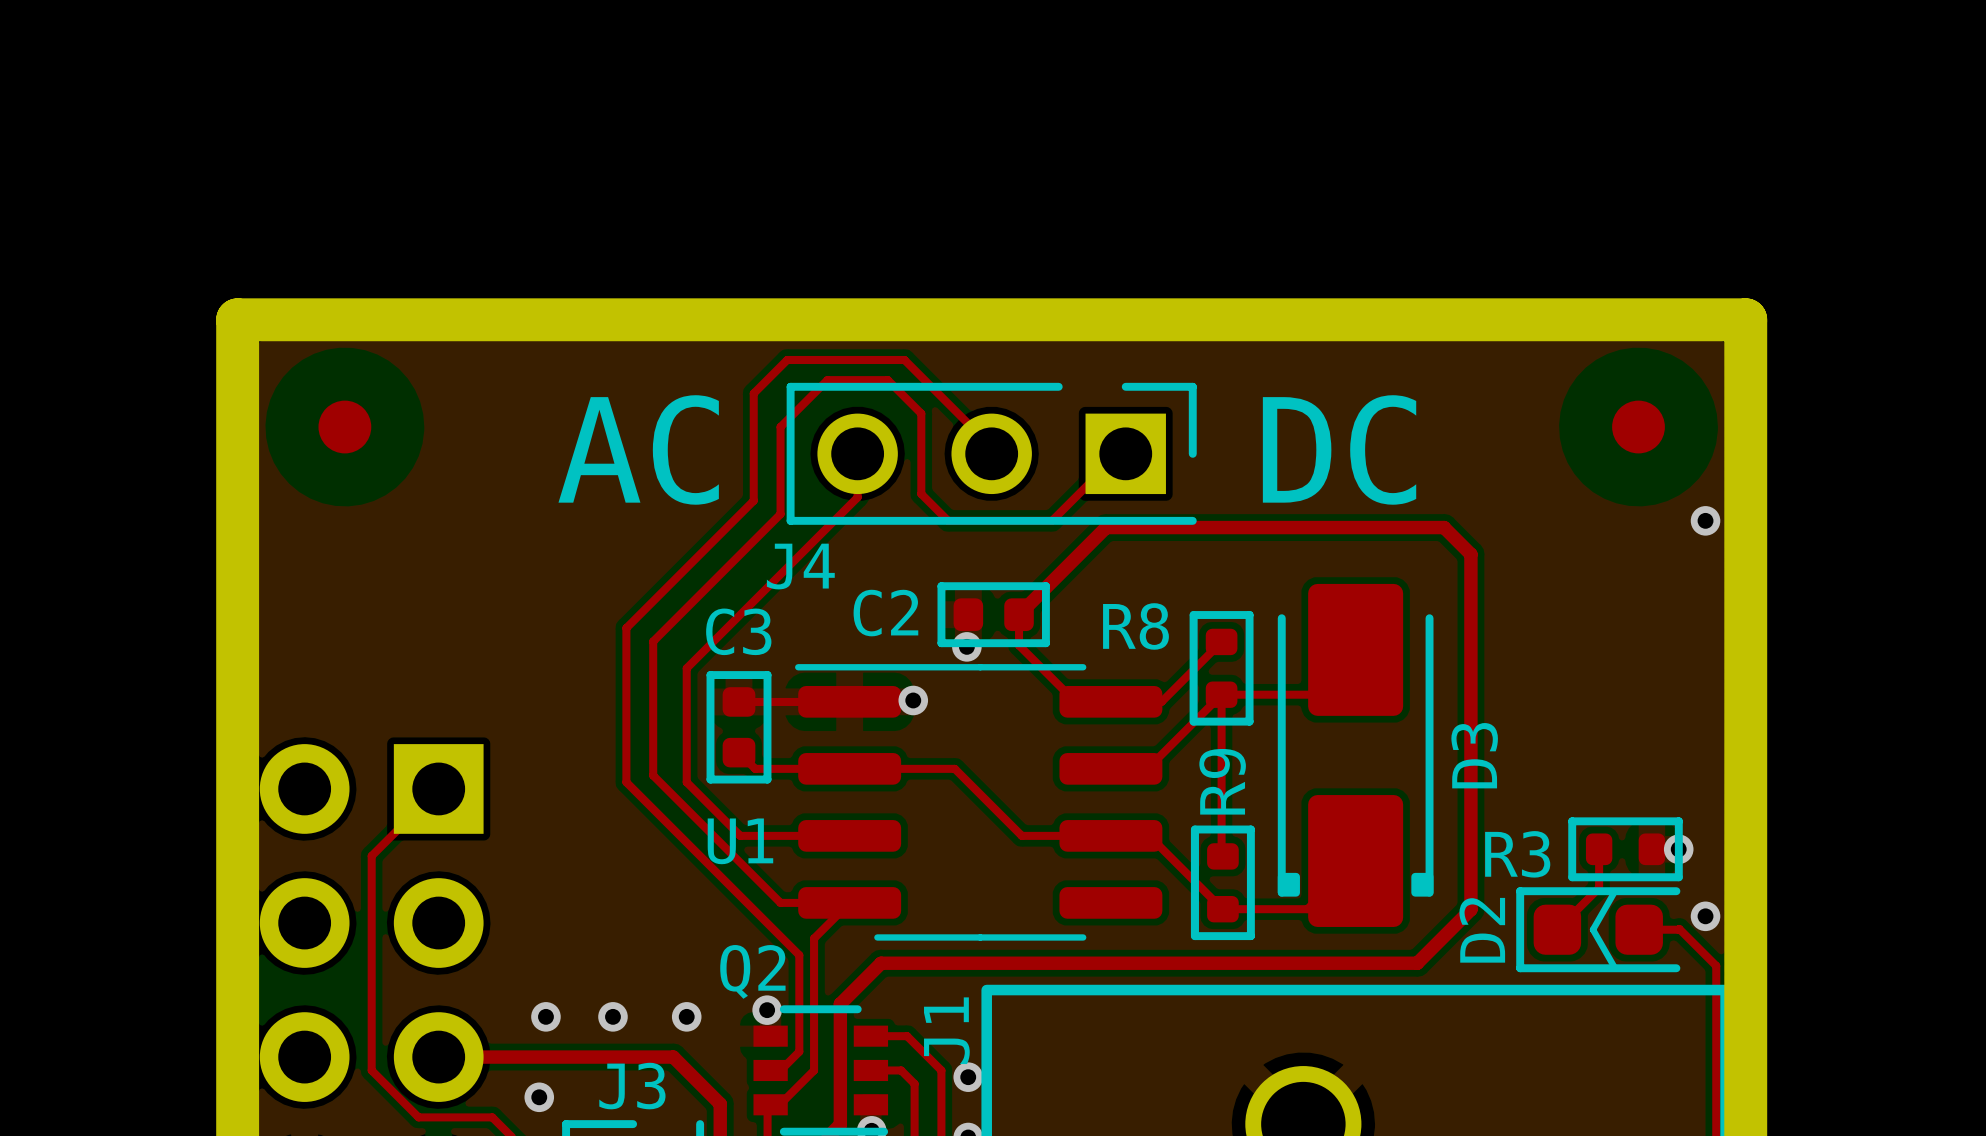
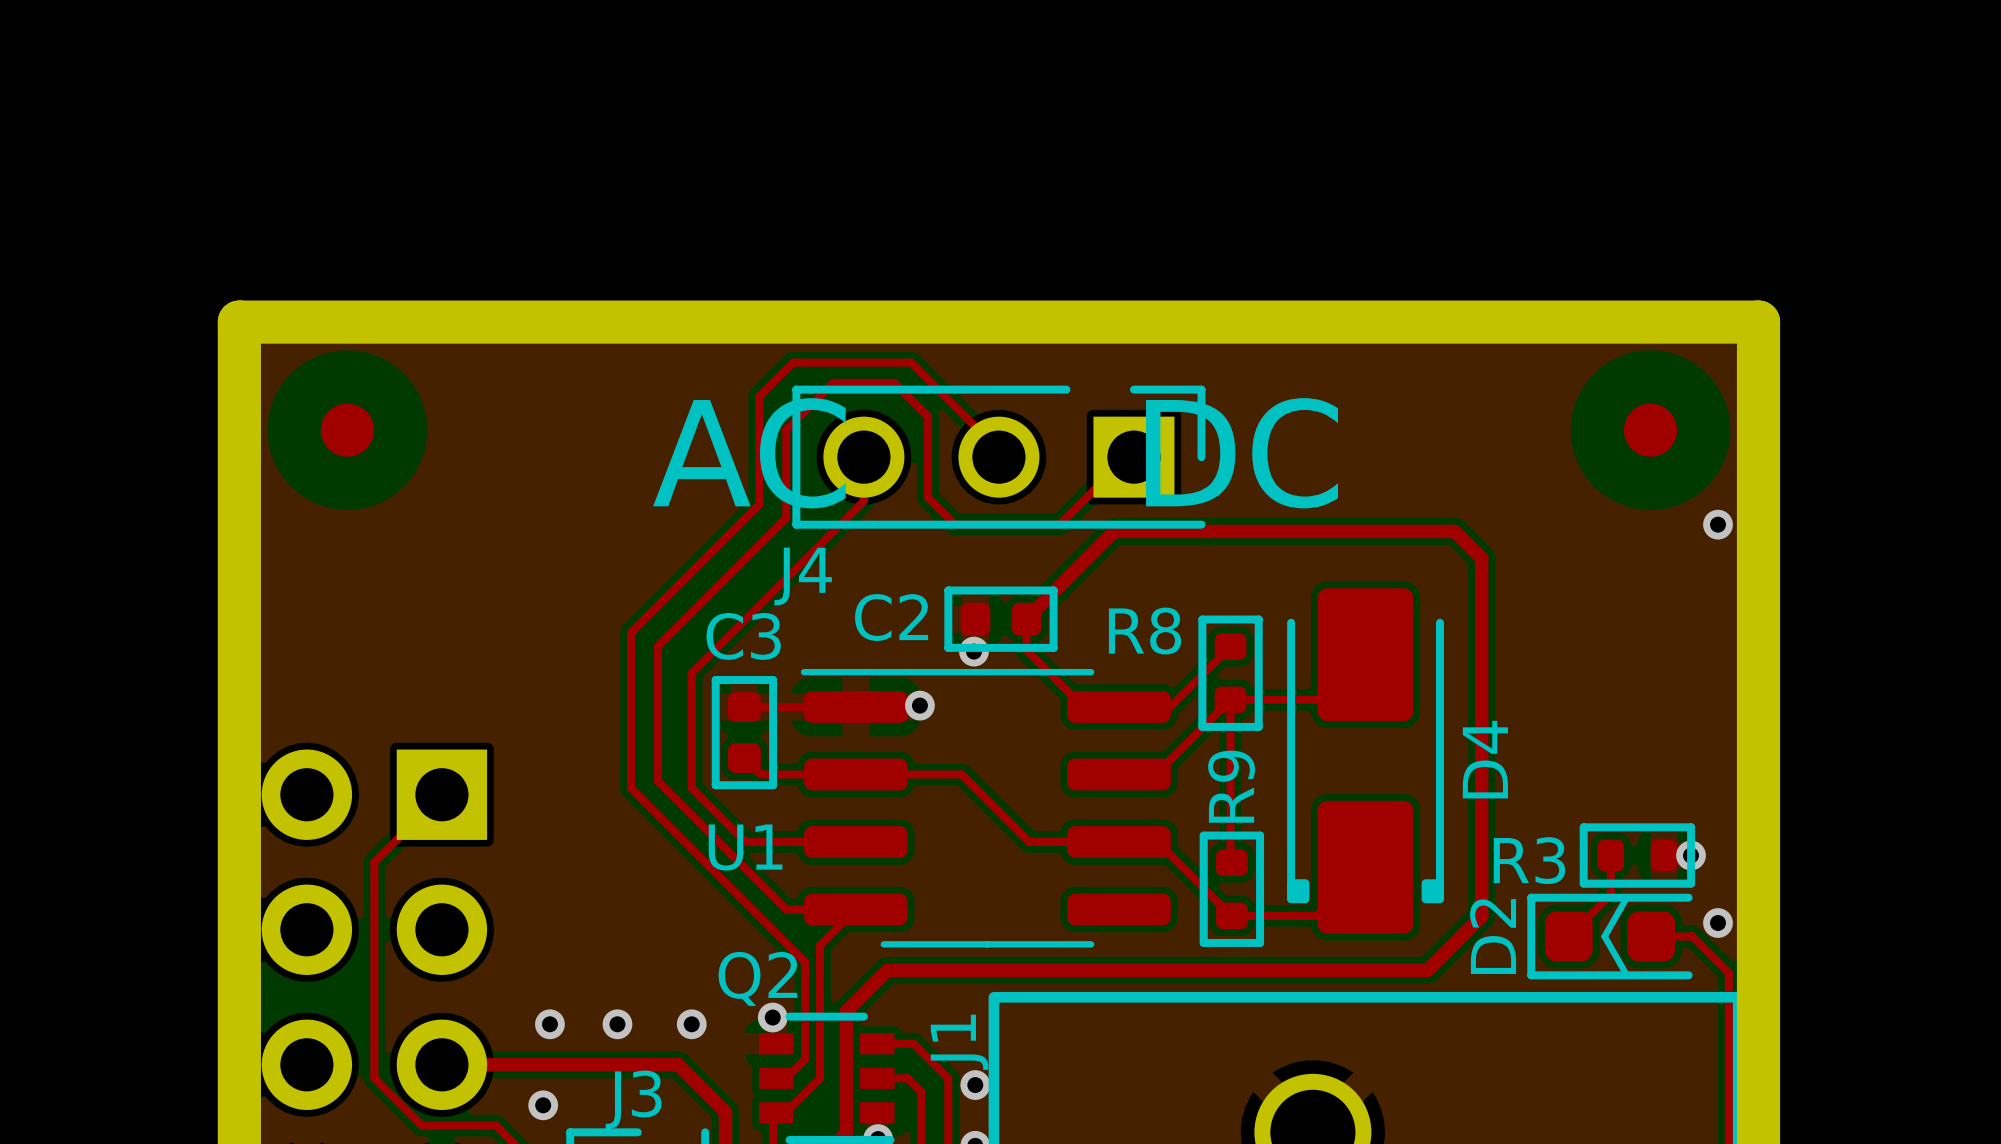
D3 name: D3 (1474, 755) -> D4 (1485, 759)

